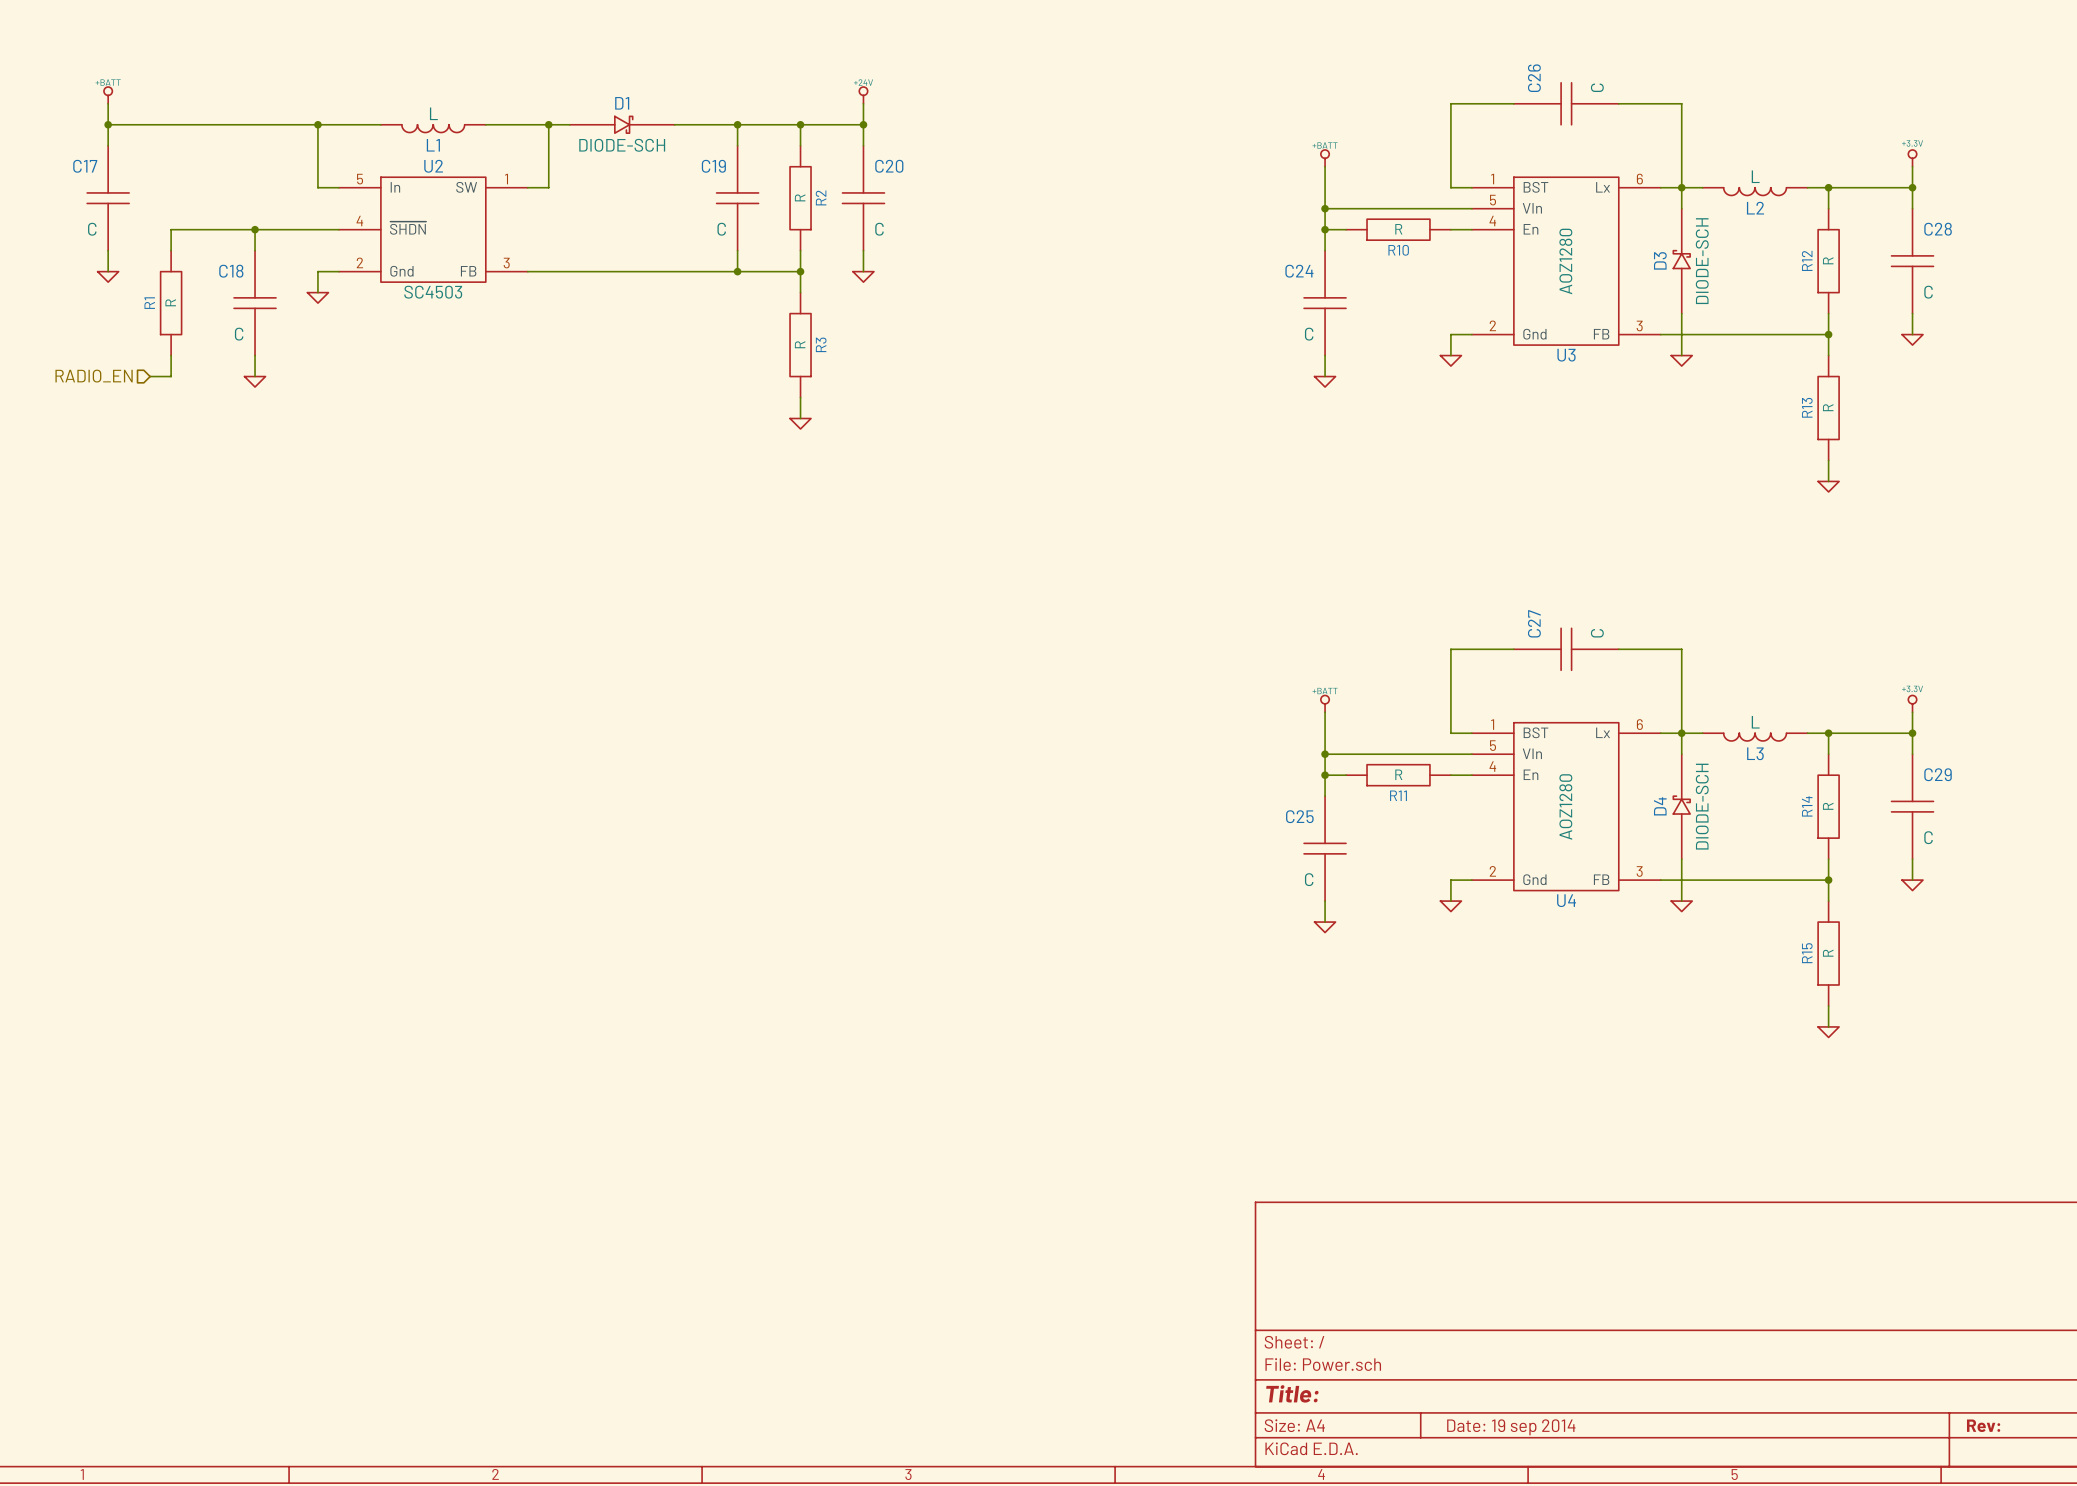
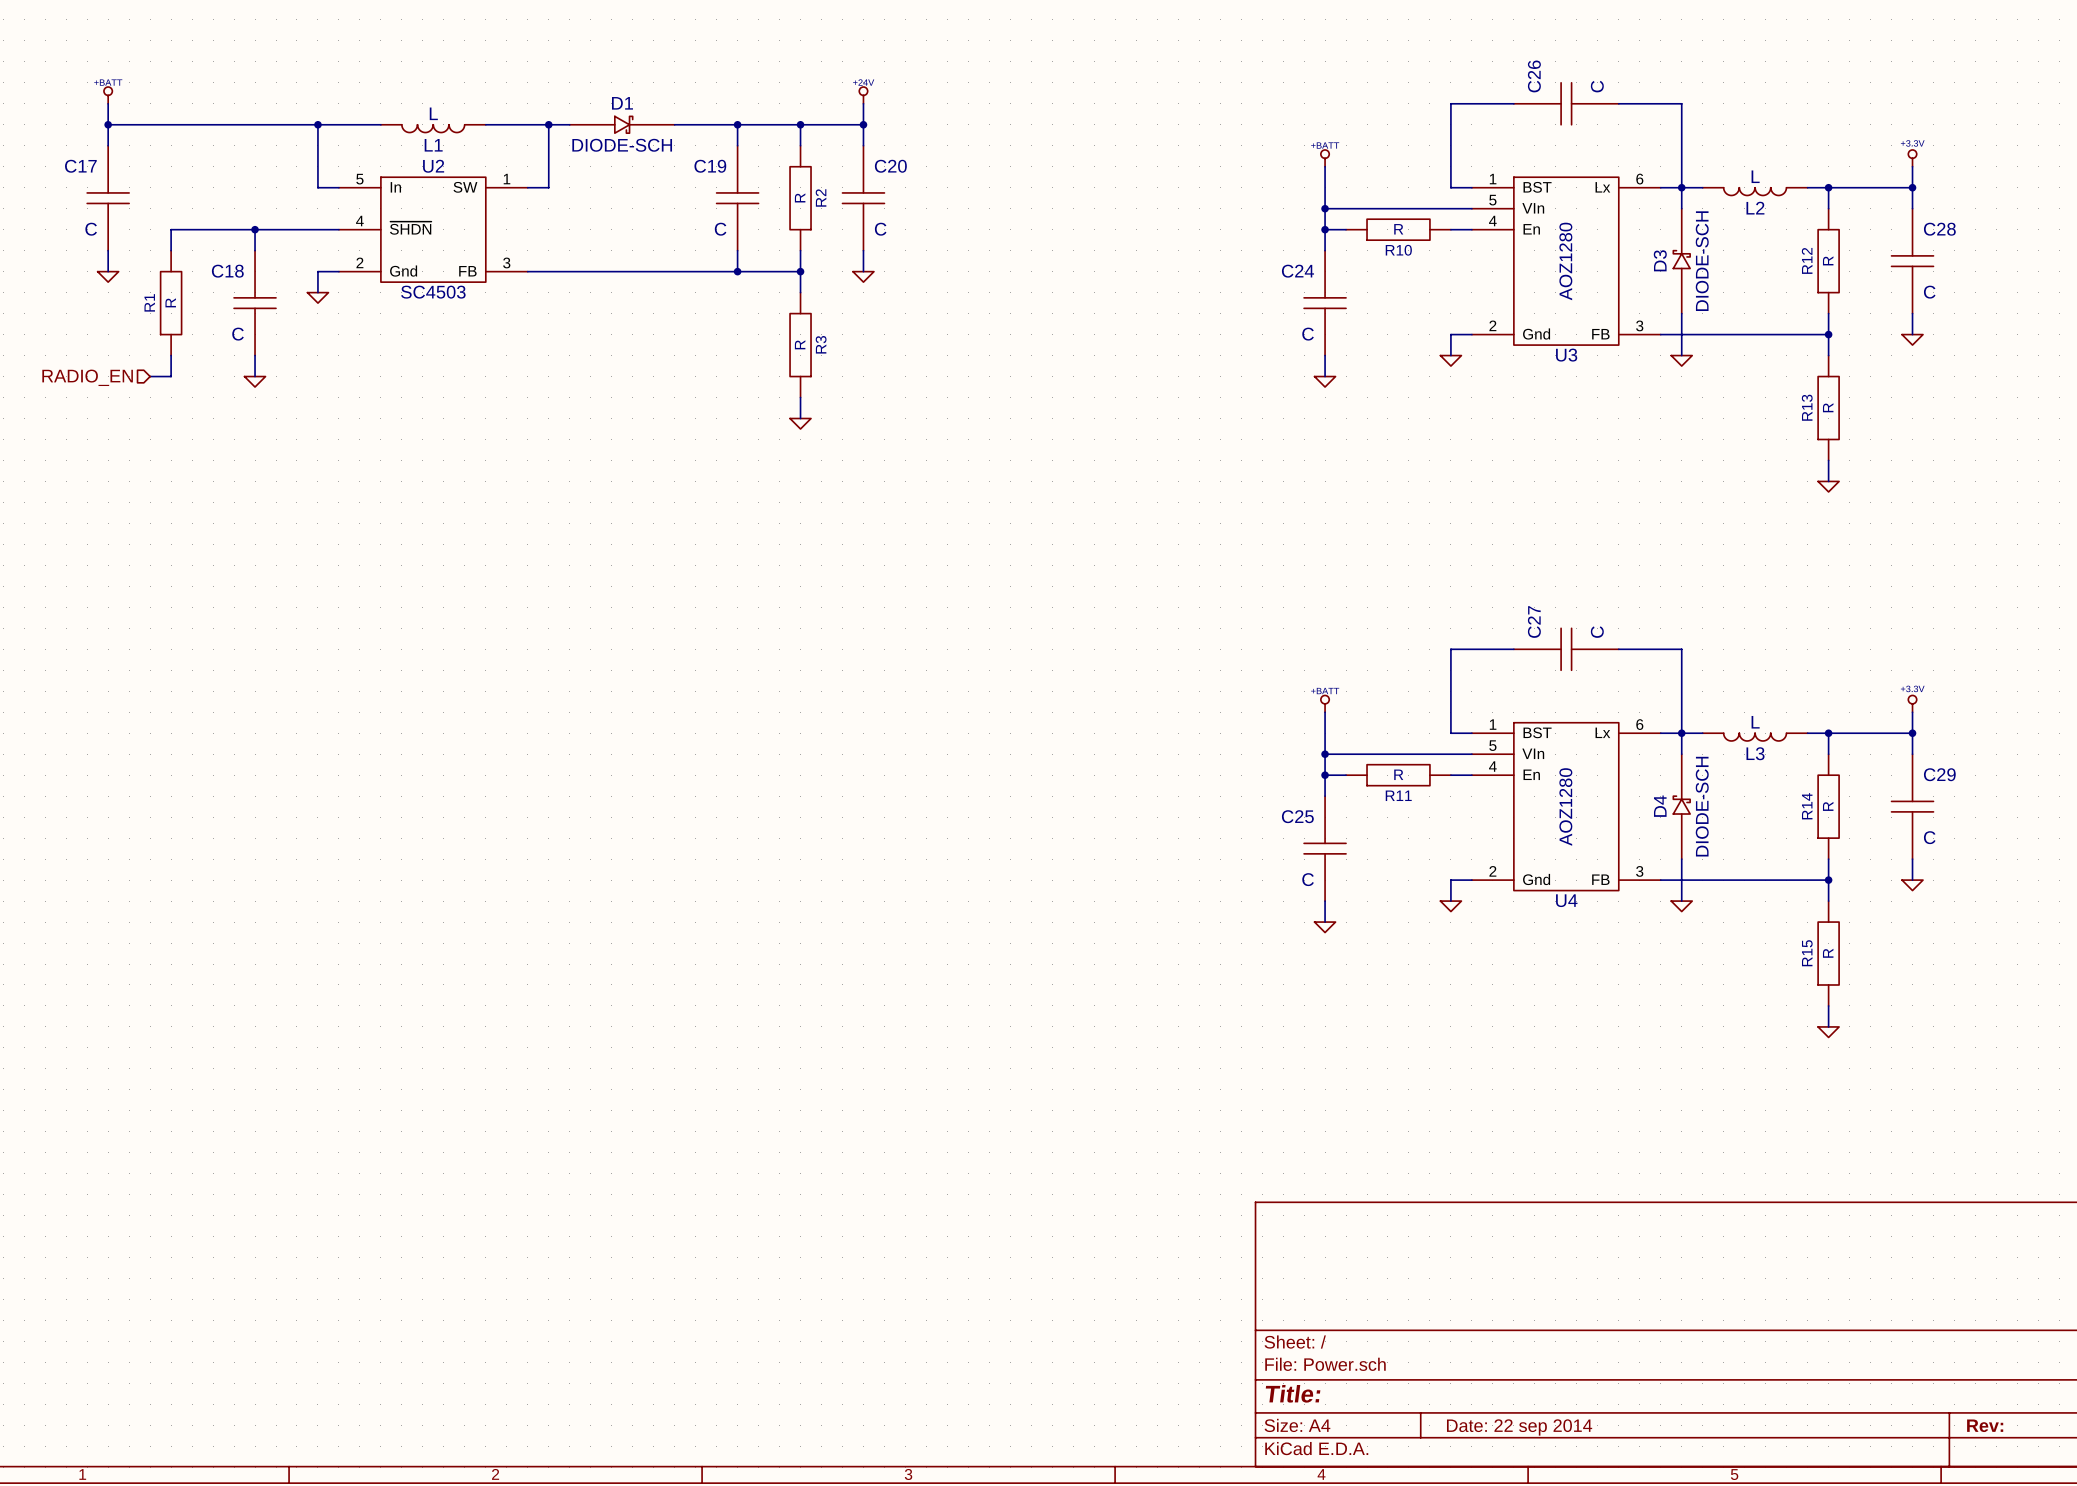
title block: Date: 19 sep 2014 (1511, 1427) -> Date: 22 sep 2014 (1519, 1427)

